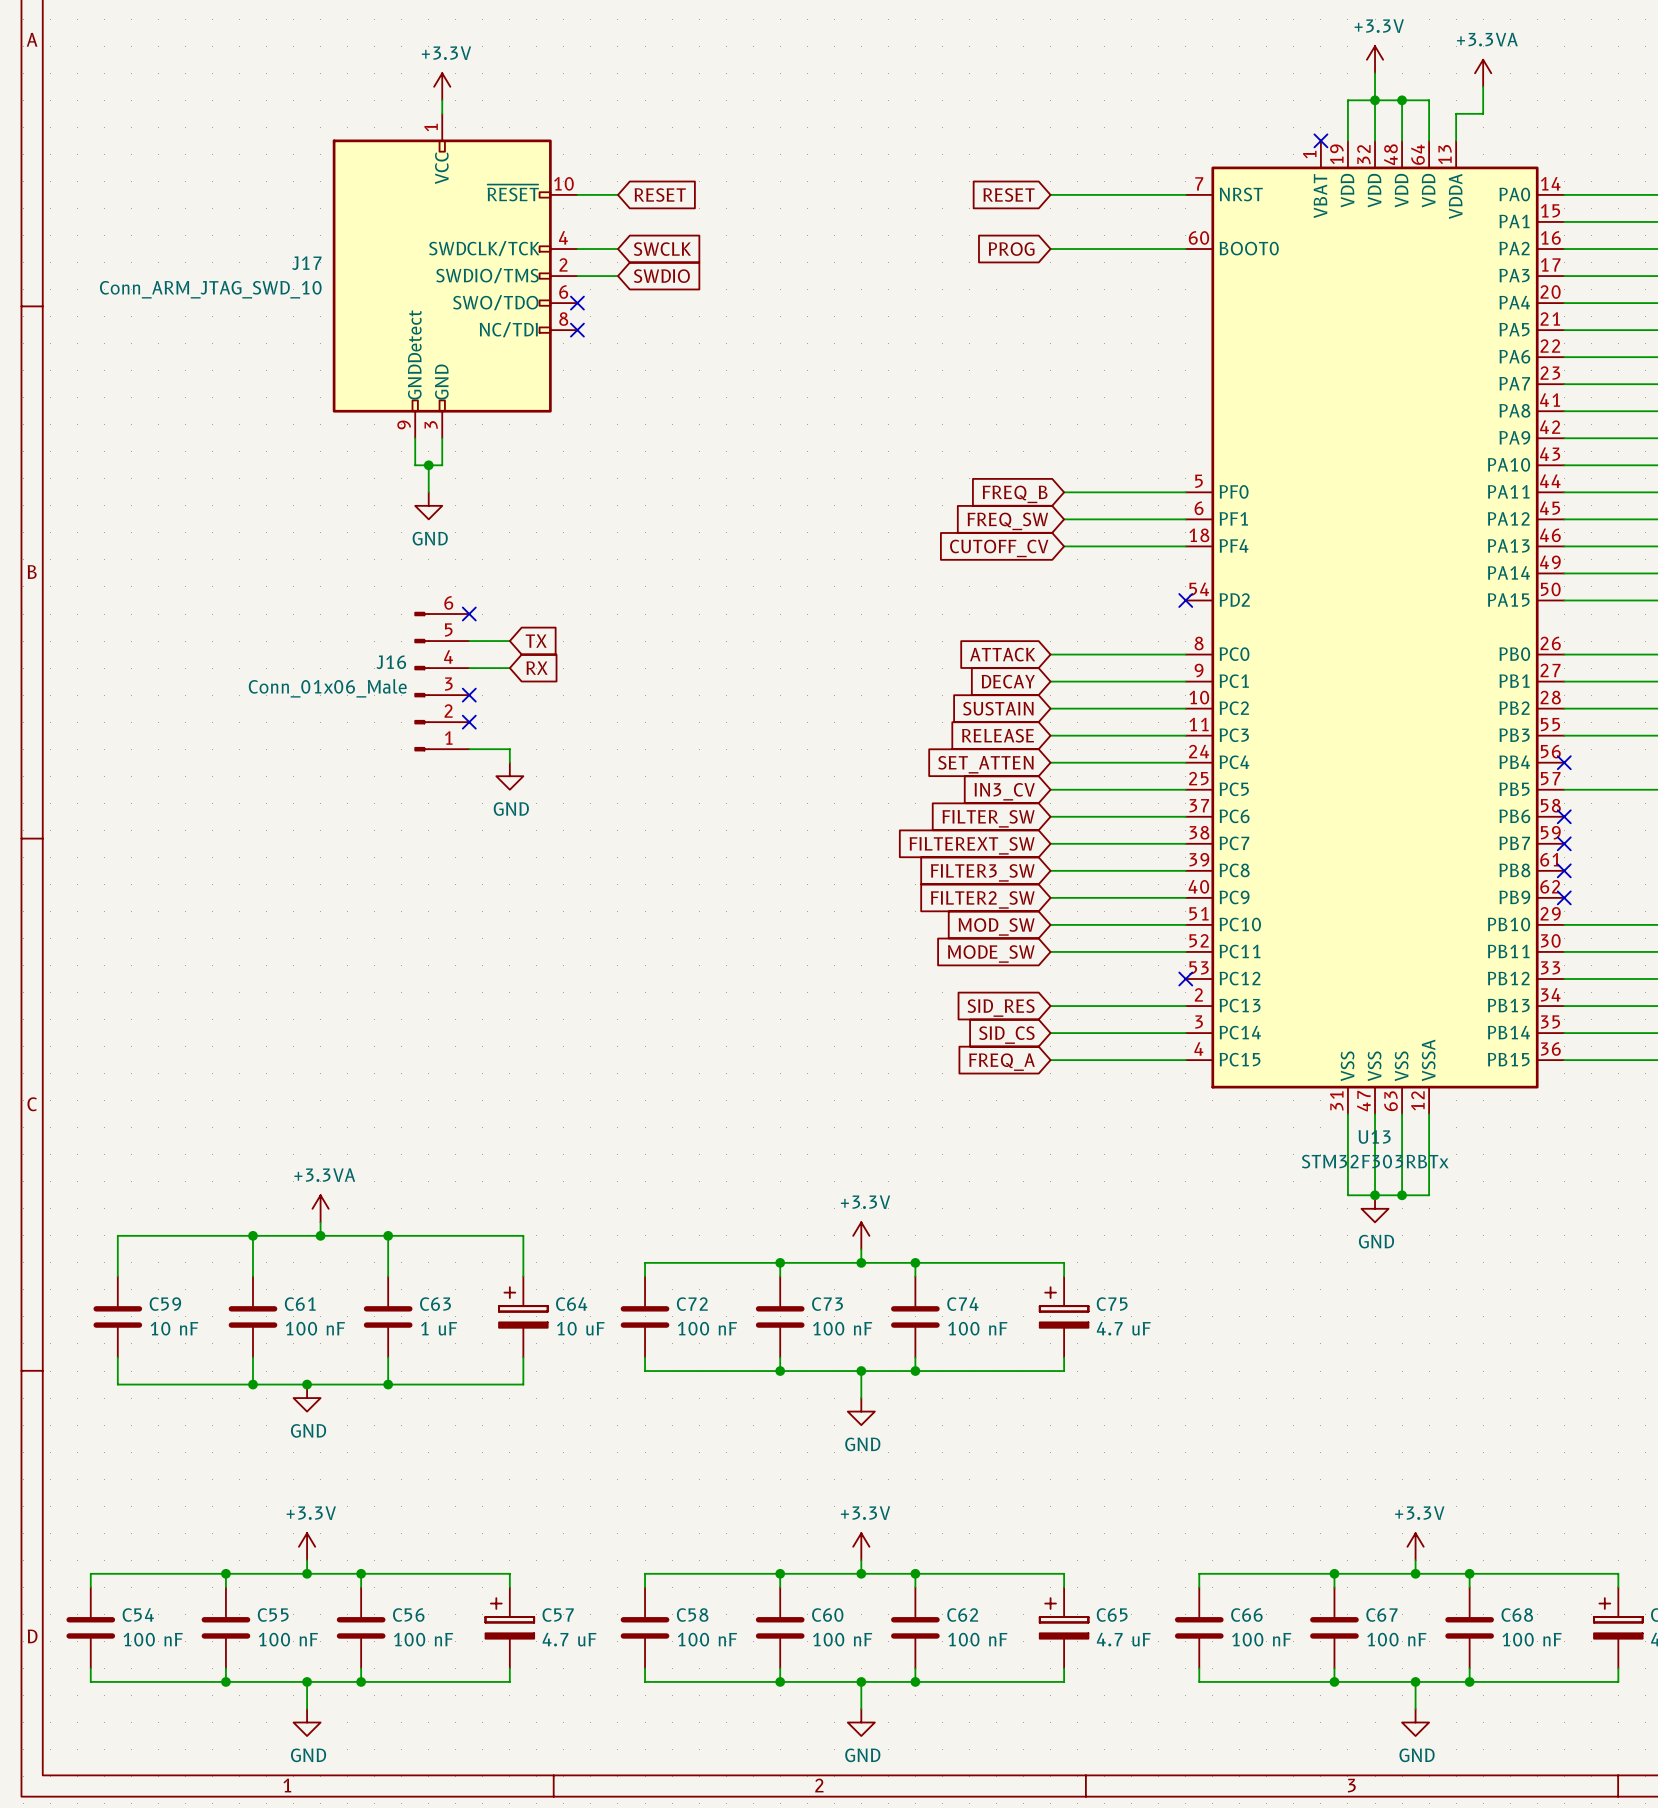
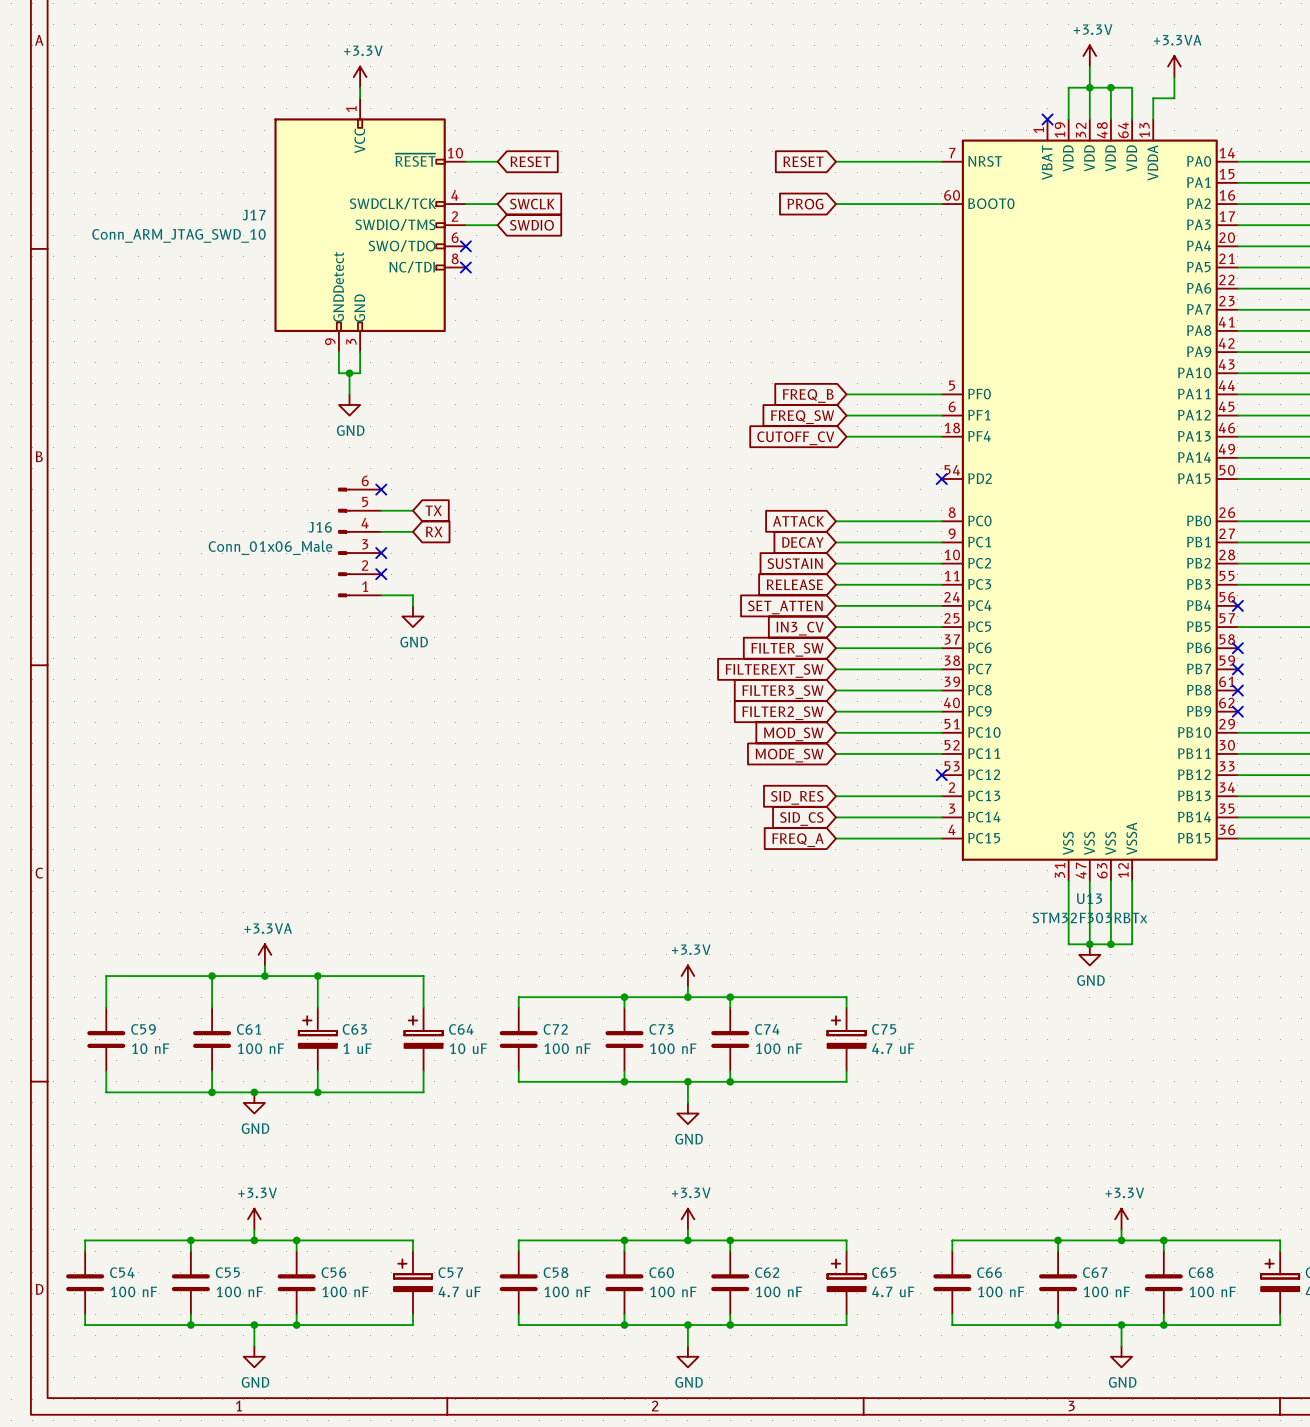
C63 symbol: [363, 1276, 413, 1358] -> [298, 1007, 337, 1072]

